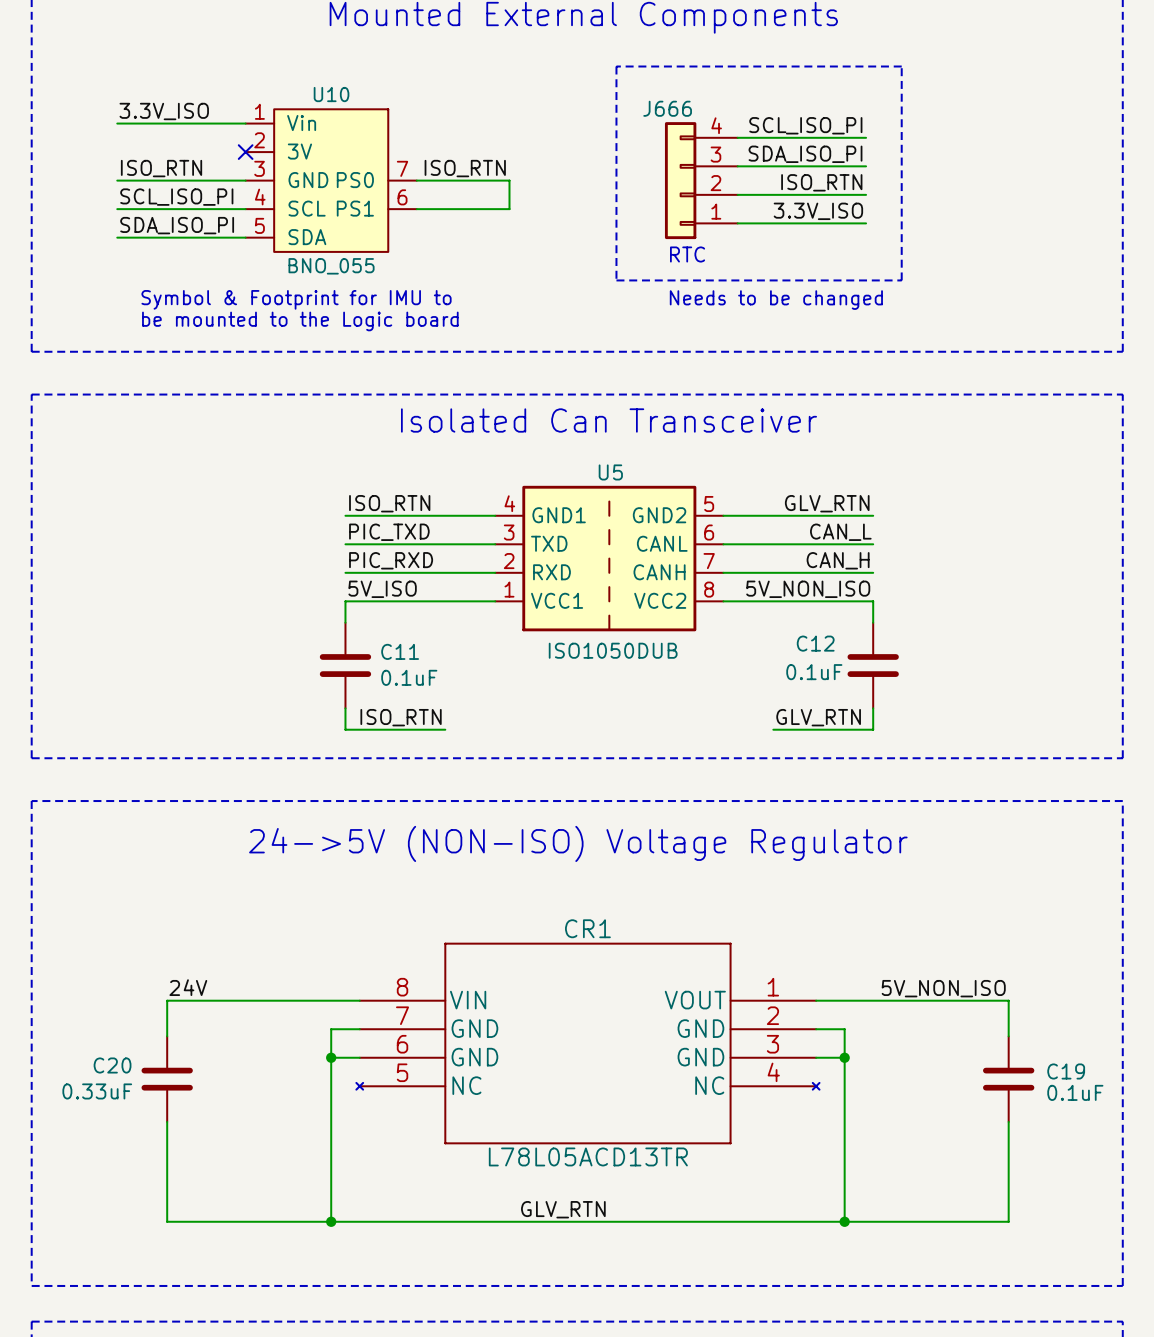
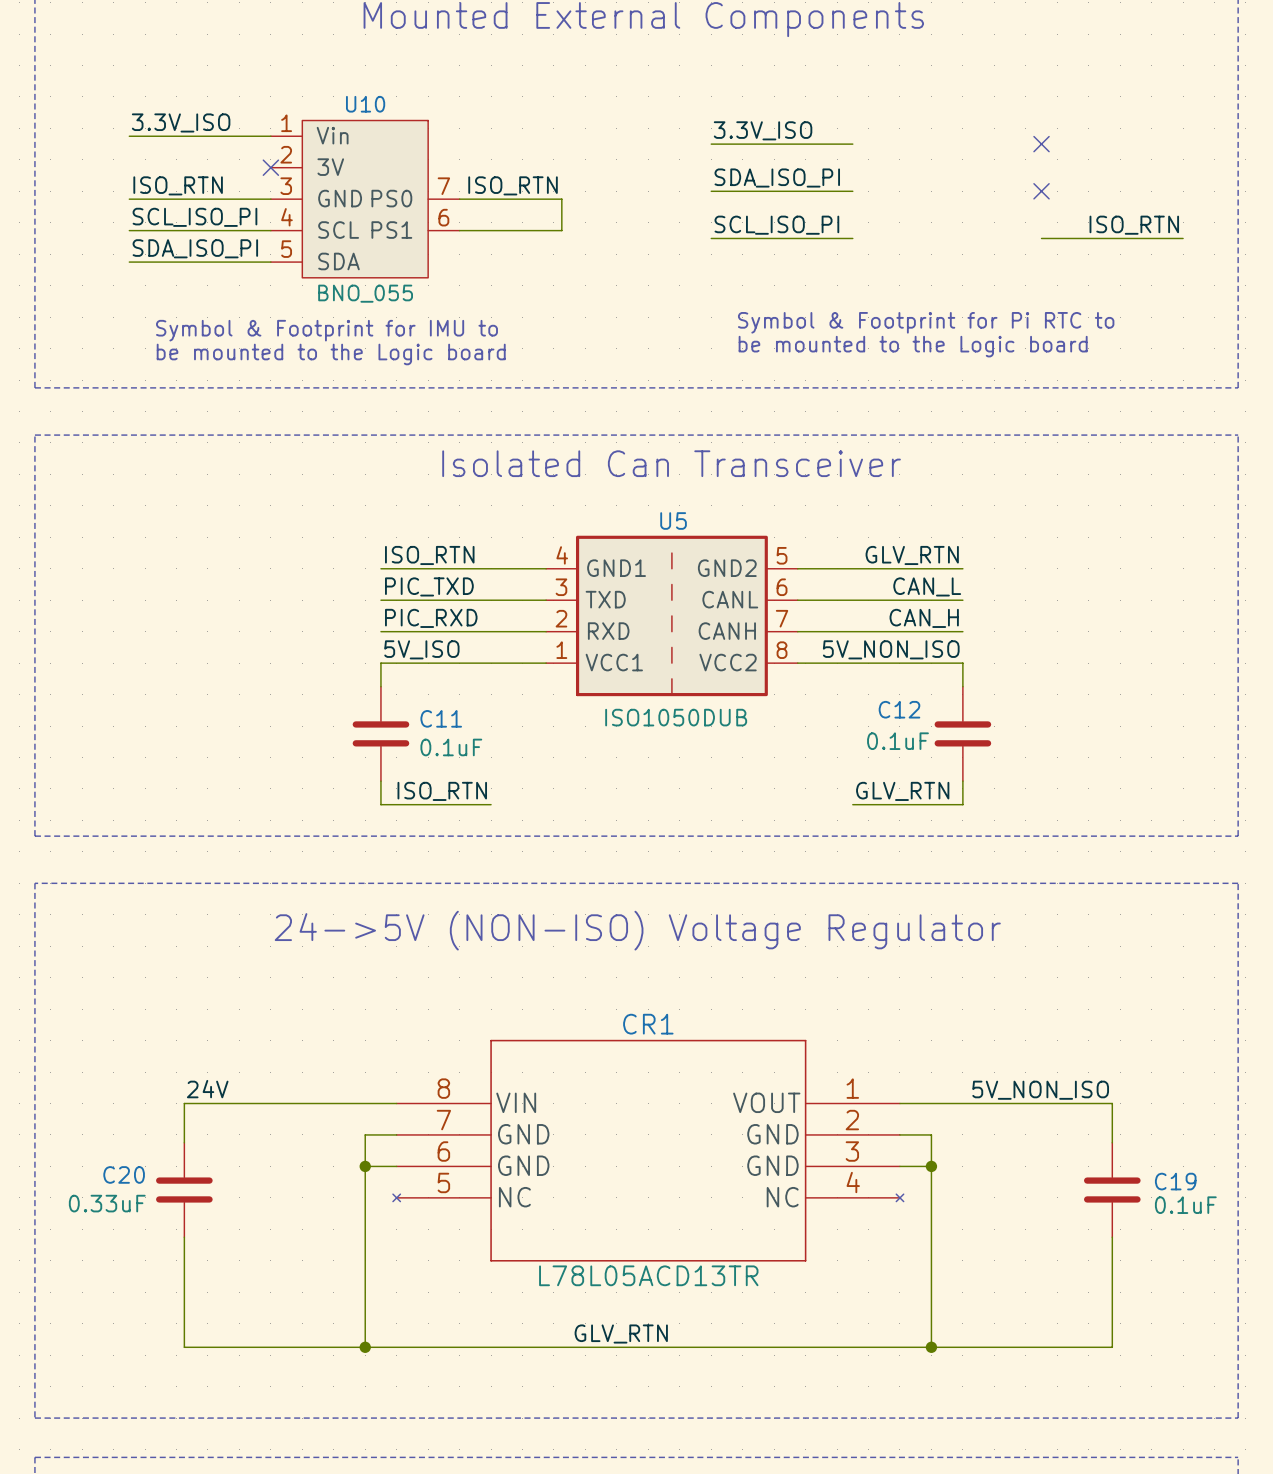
line: (616, 66) (901, 66) (901, 280) (616, 280) (616, 66) -> none
label position: SCL_ISO_PI (805, 125) -> SCL_ISO_PI (776, 225)
no-connect mark: none -> (1041, 144)
wire: (737, 137) (866, 137) -> (711, 144) (852, 144)
label position: SDA_ISO_PI (805, 154) -> SDA_ISO_PI (777, 178)
wire: (737, 166) (866, 166) -> (711, 191) (852, 191)
no-connect mark: none -> (1041, 191)
J666: (701, 180) -> none
label position: ISO_RTN (821, 182) -> ISO_RTN (1134, 225)
wire: (737, 194) (866, 194) -> (1041, 238) (1183, 238)
label position: 3.3V_ISO (818, 211) -> 3.3V_ISO (763, 130)
wire: (737, 223) (866, 223) -> (711, 238) (852, 238)
text: RTC (687, 254) -> none
text: none -> Symbol & Footprint for Pi RTC to (926, 322)
text: Needs to be changed (776, 300) -> none
text: none -> be mounted to the Logic board (913, 346)

